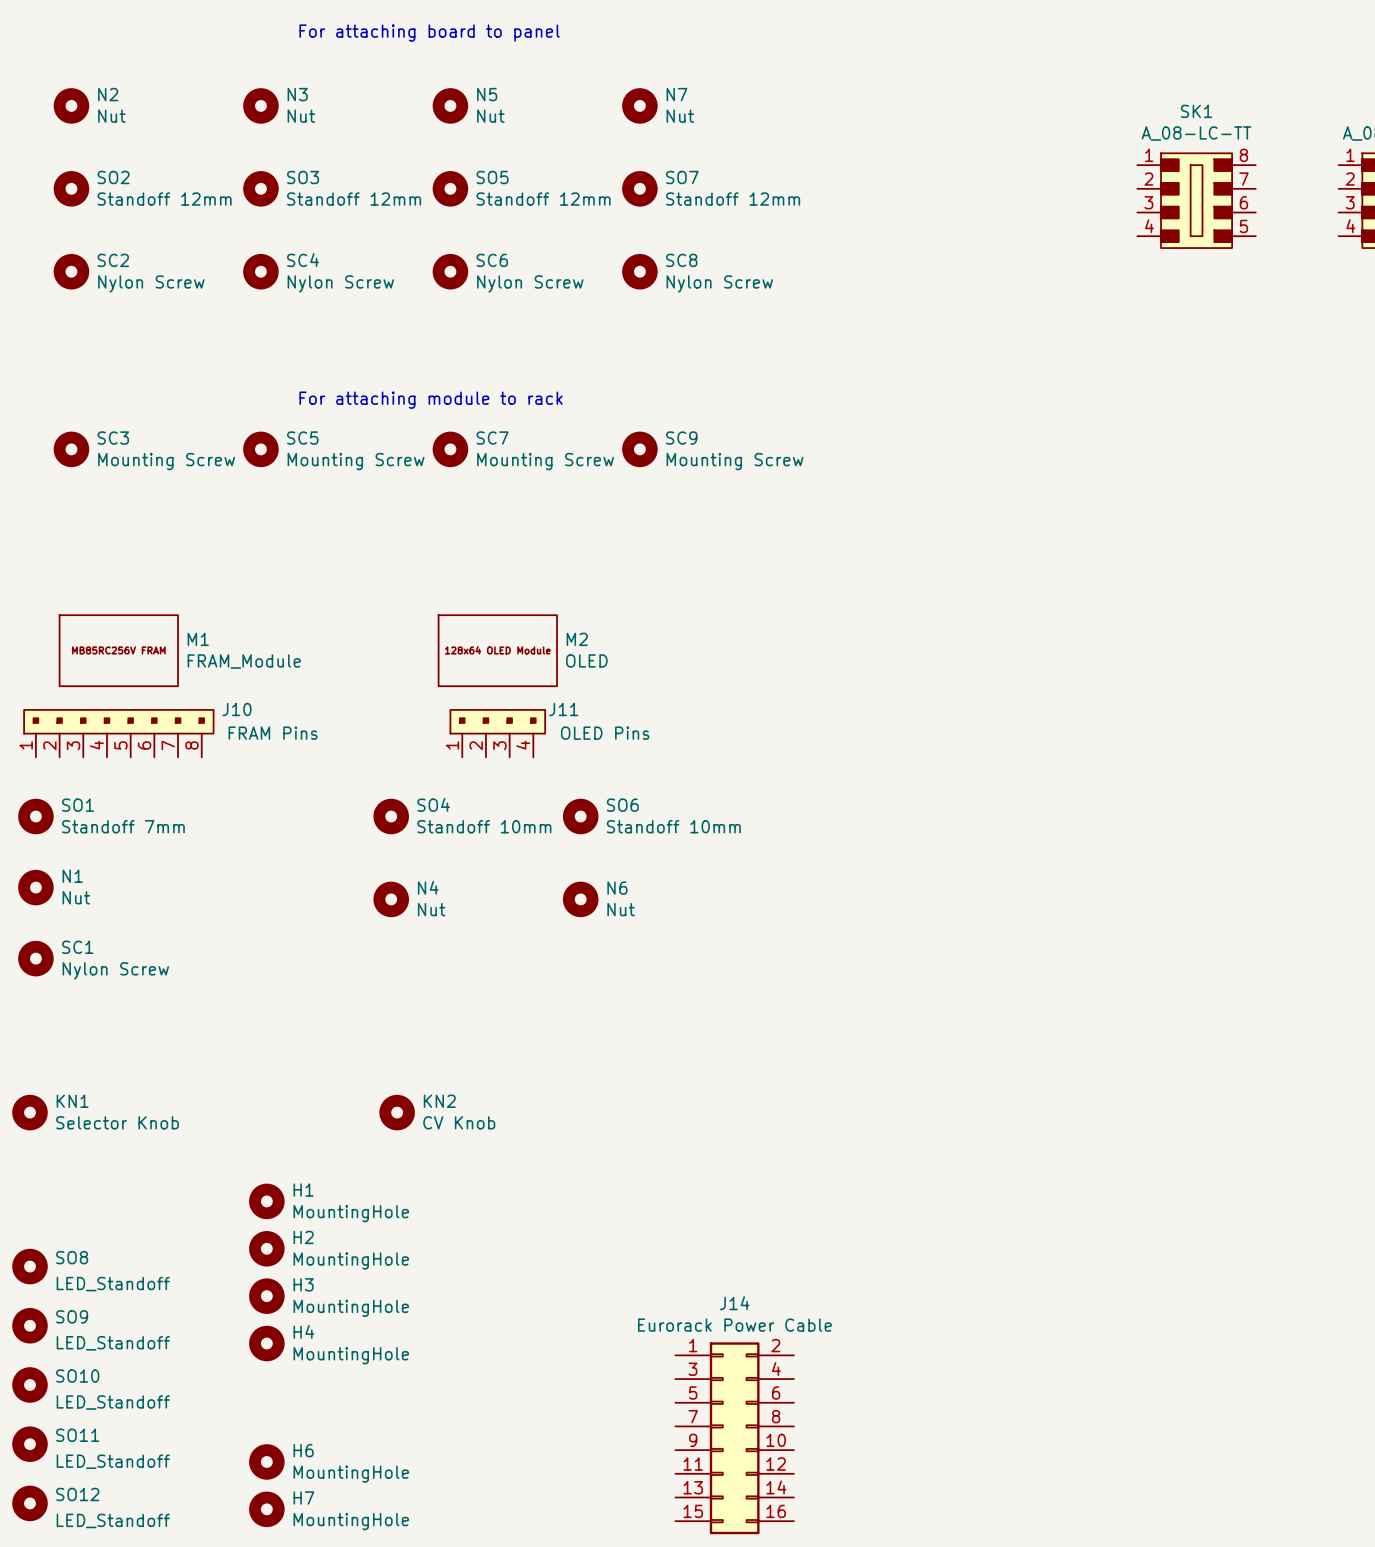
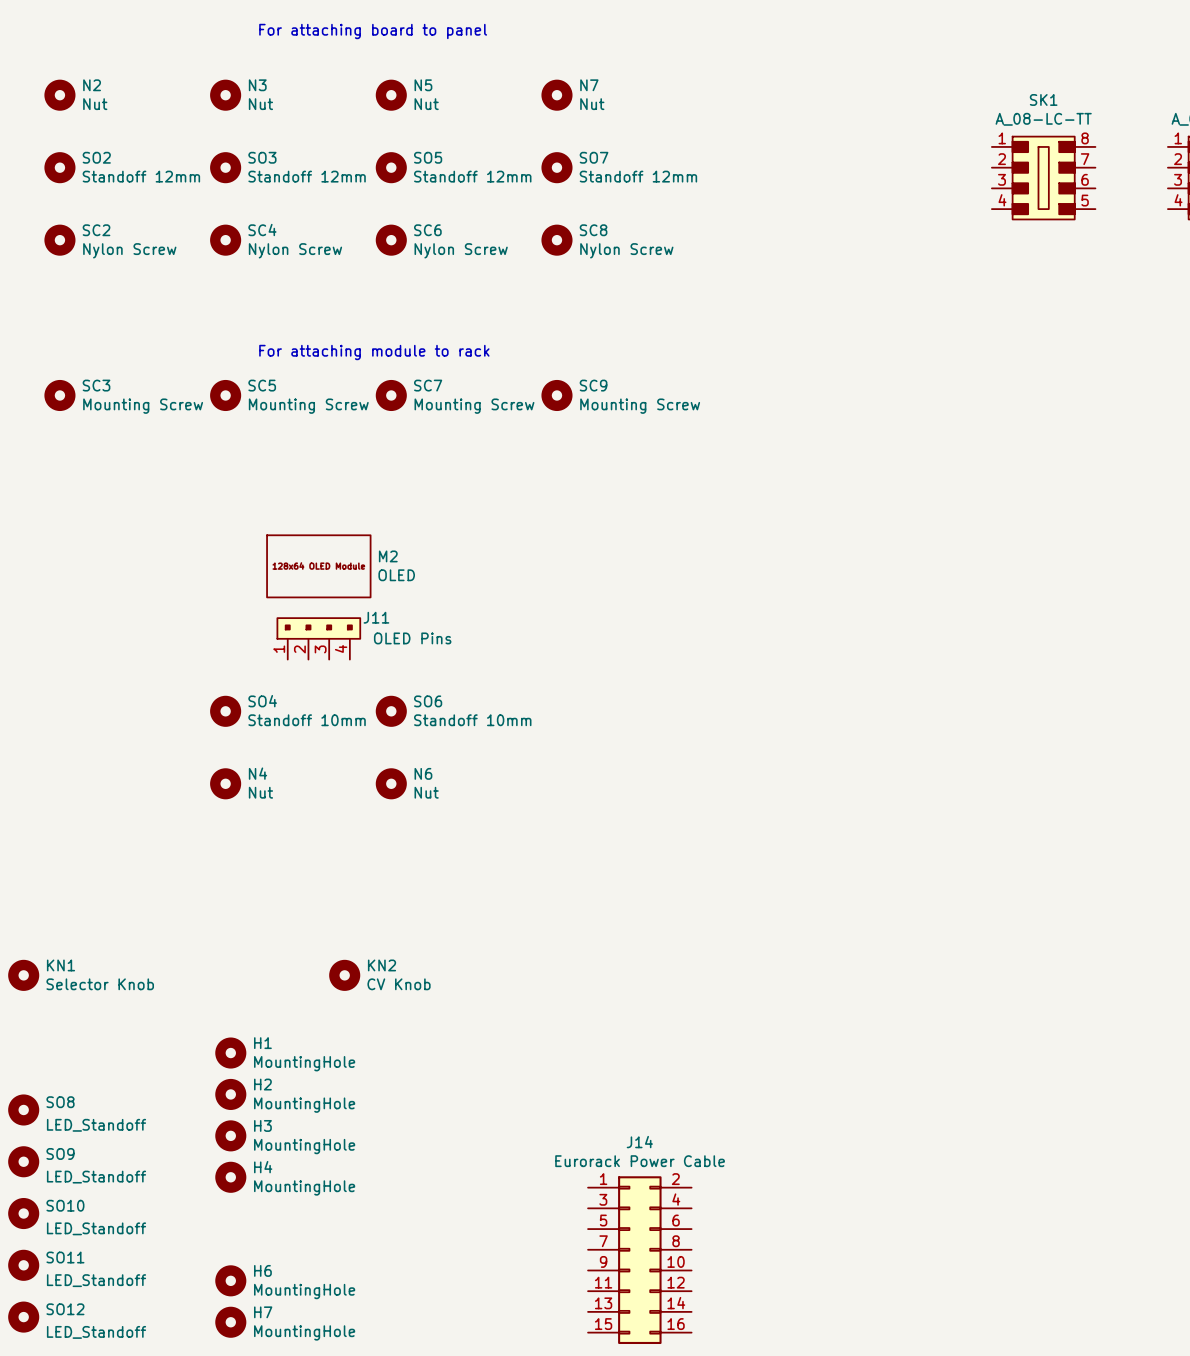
M1: FRAM_Module (118, 650) -> none
M2 position: (497, 650) -> (318, 566)
J10: FRAM Pins (118, 733) -> none
J11 position: (497, 733) -> (318, 638)
SO1: Standoff 7mm (35, 816) -> none
SO4 position: (391, 816) -> (225, 711)
SO6 position: (580, 816) -> (391, 711)
N1: Nut (35, 887) -> none
N4 position: (391, 899) -> (225, 783)
N6 position: (580, 899) -> (391, 783)
SC1: Nylon Screw (35, 958) -> none

